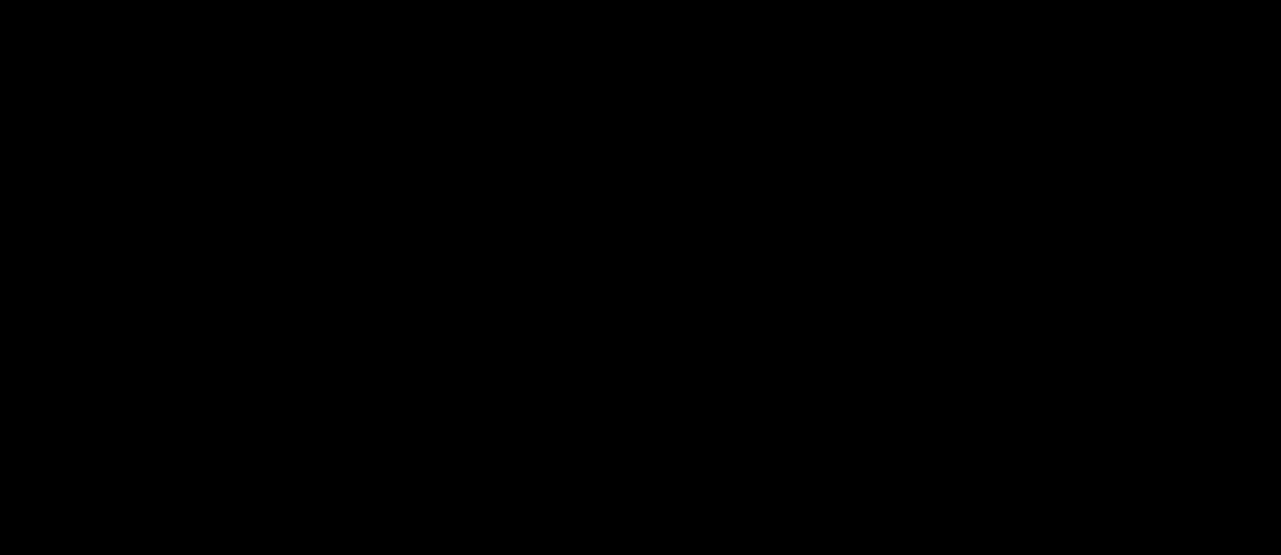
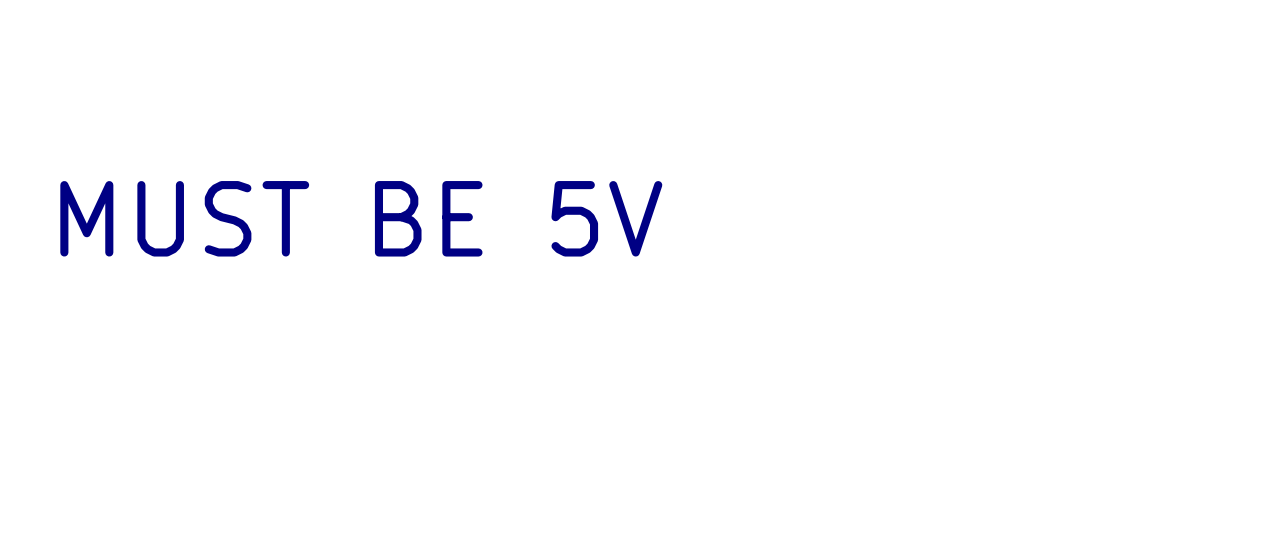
text: none -> MUST BE 5V (361, 218)

